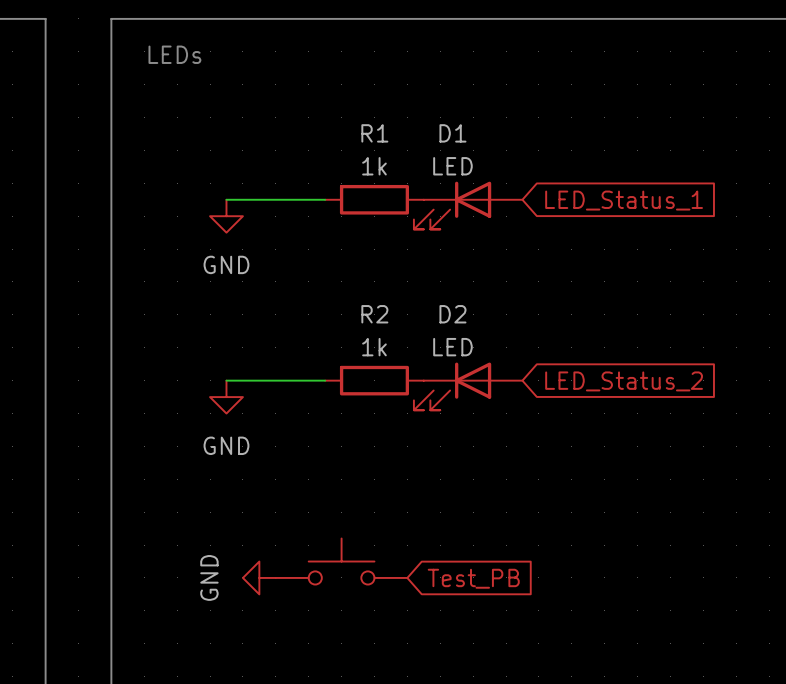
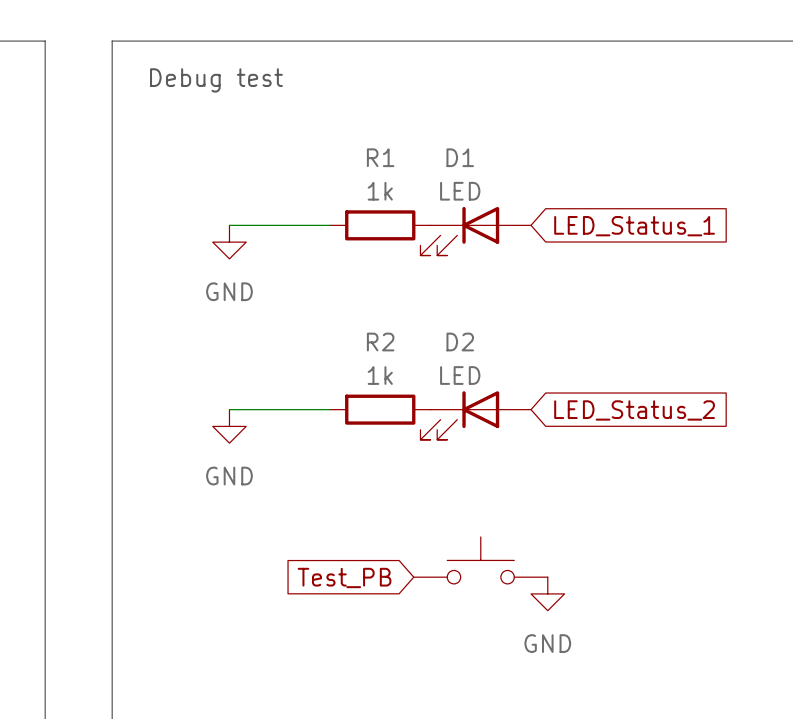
text: LEDs (174, 54) -> Debug test (216, 80)
part position: (341, 561) -> (480, 560)
power symbol rotation: 0° (259, 577) -> 90° counterclockwise (547, 593)
power symbol position: GND (259, 577) -> GND (547, 593)
global label rotation: 0° (473, 578) -> 180° (344, 577)
global label position: Test_PB (473, 578) -> Test_PB (344, 577)

